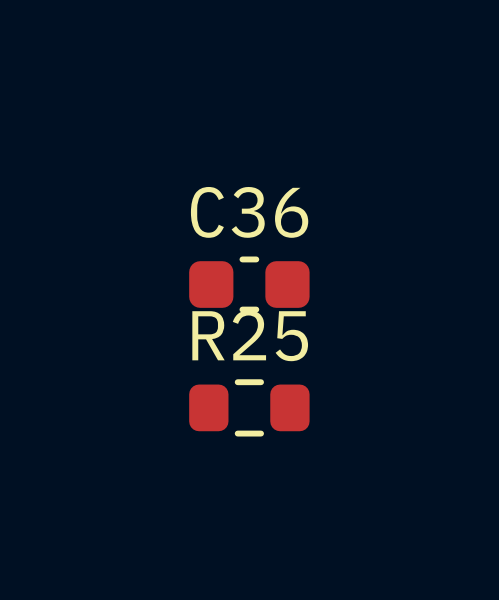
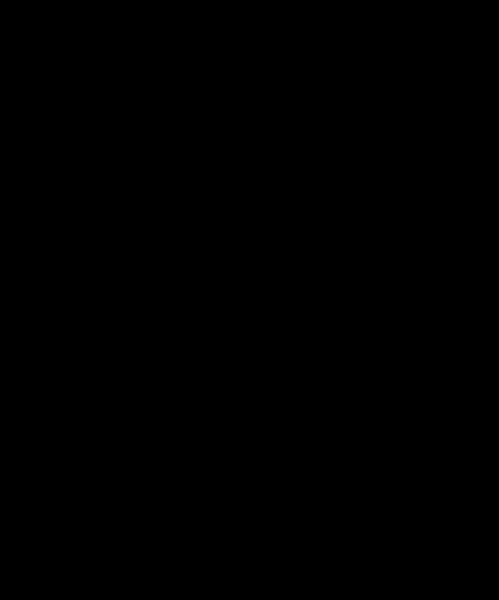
C36: (249, 284) -> none
R25: (249, 407) -> none

